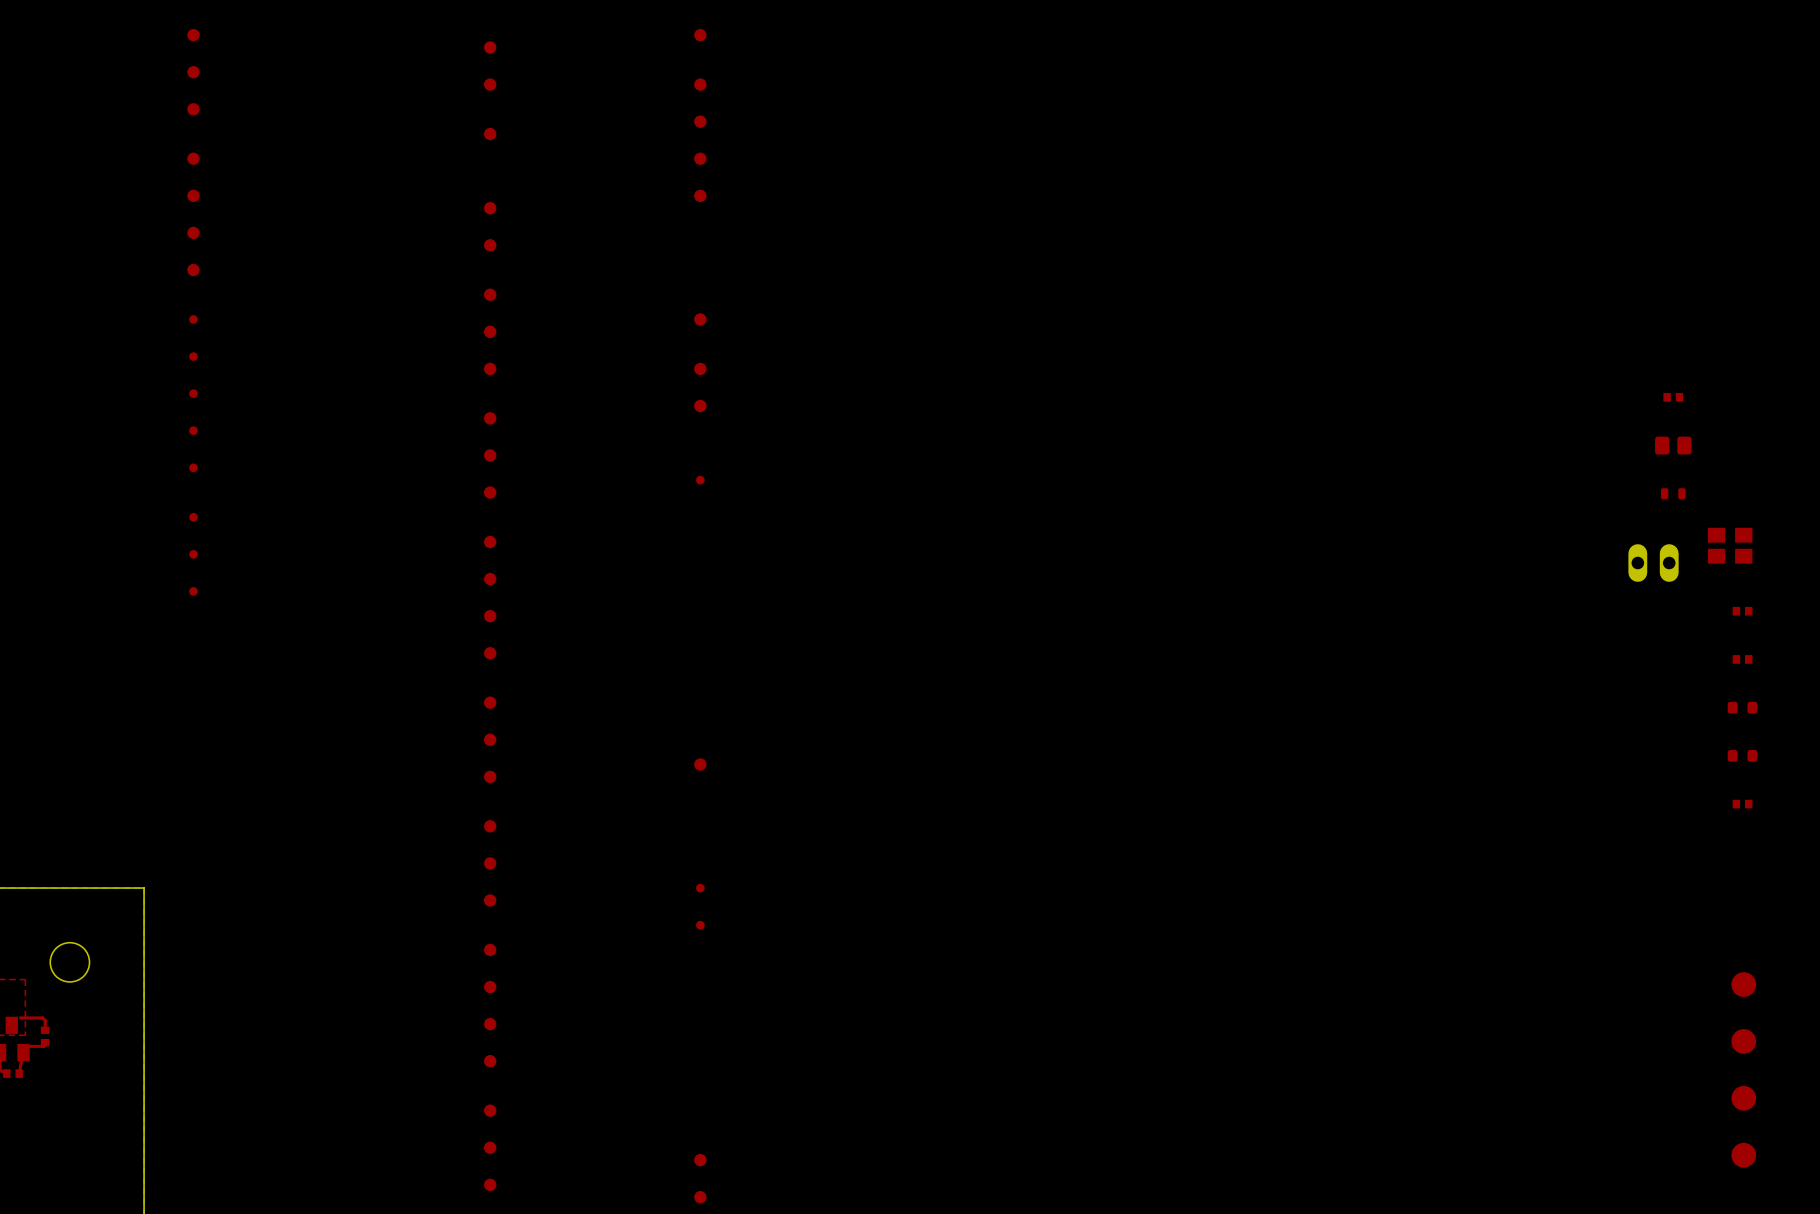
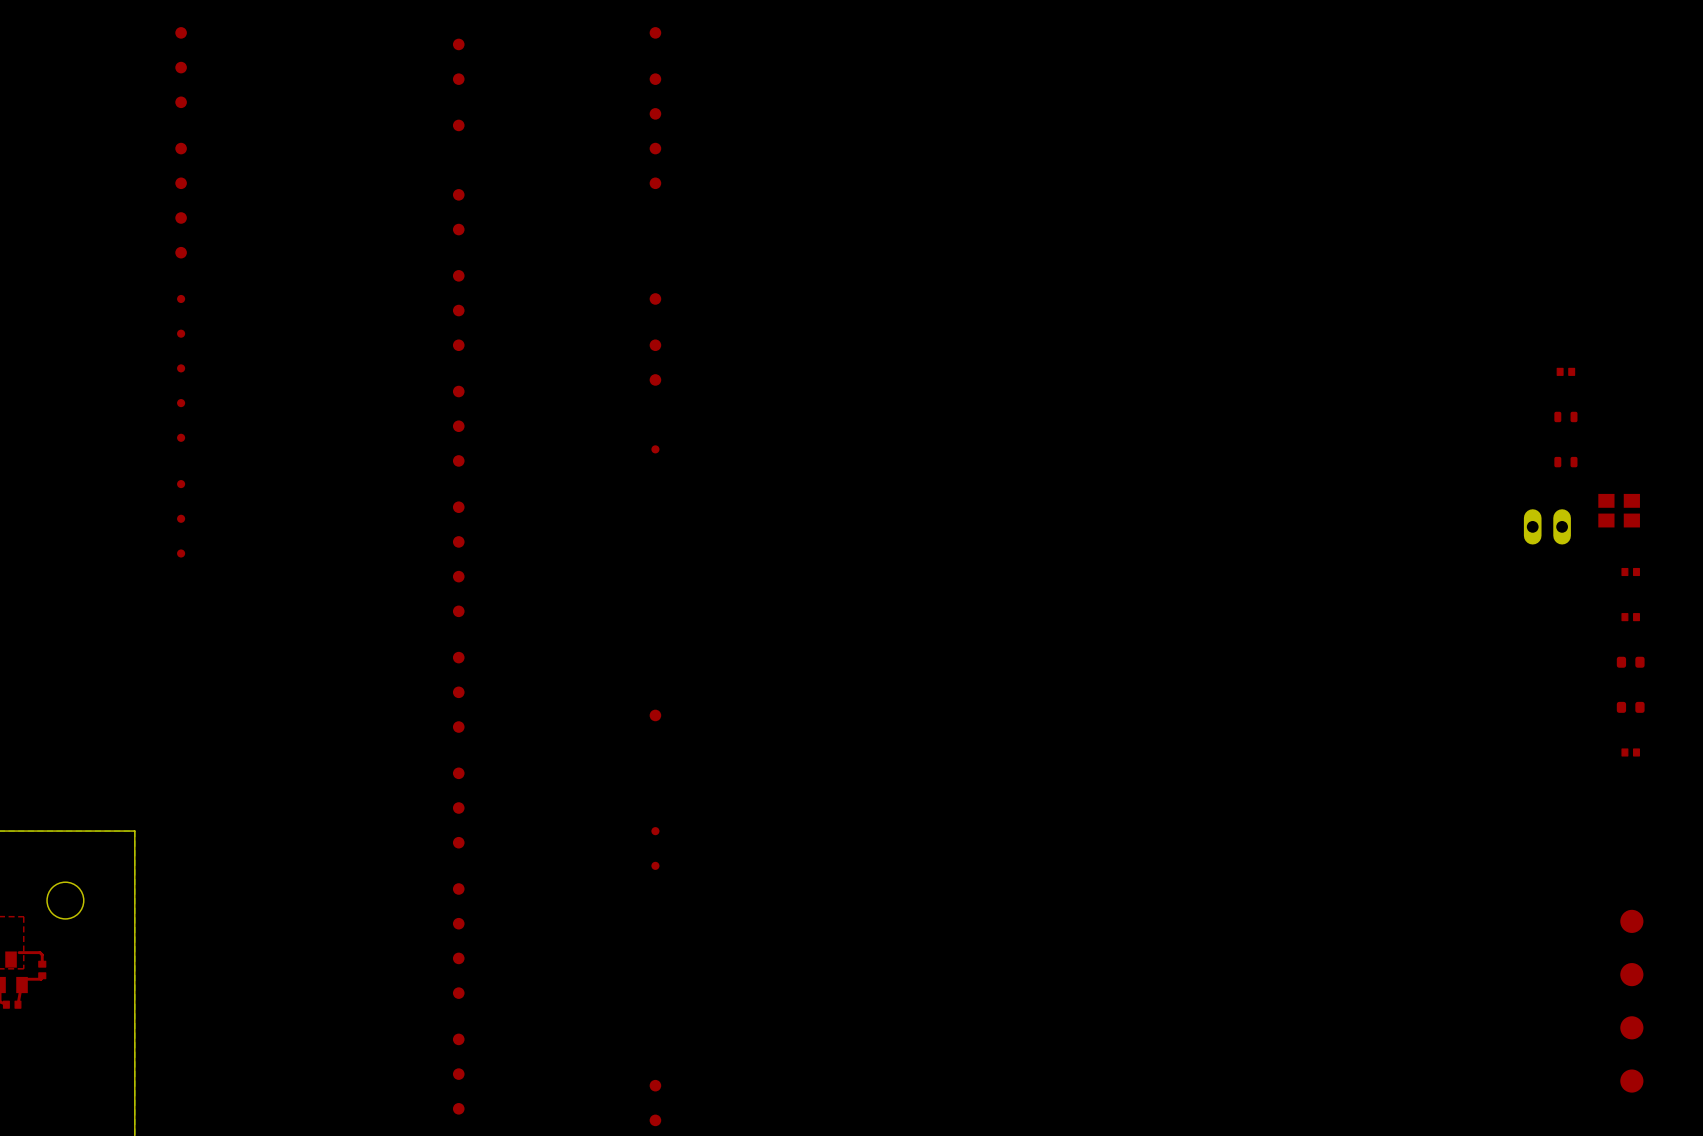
part footprint: [1655, 436, 1692, 455] -> [1554, 411, 1578, 423]

